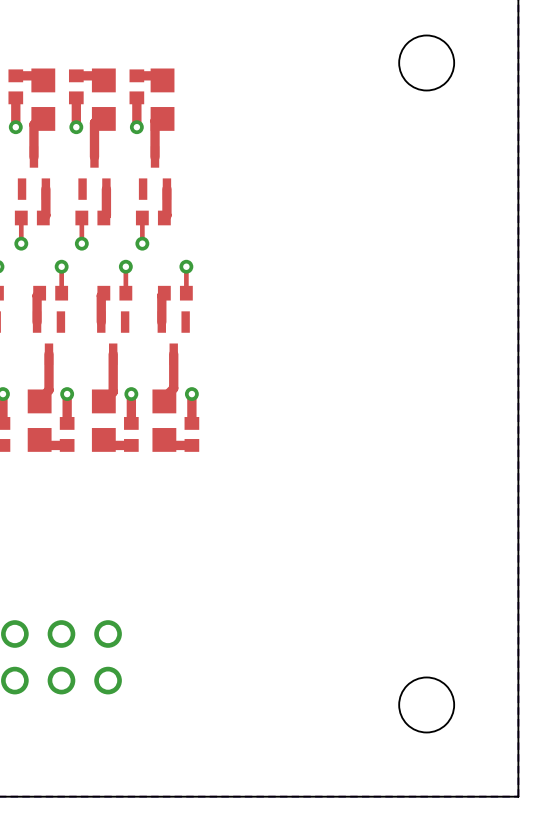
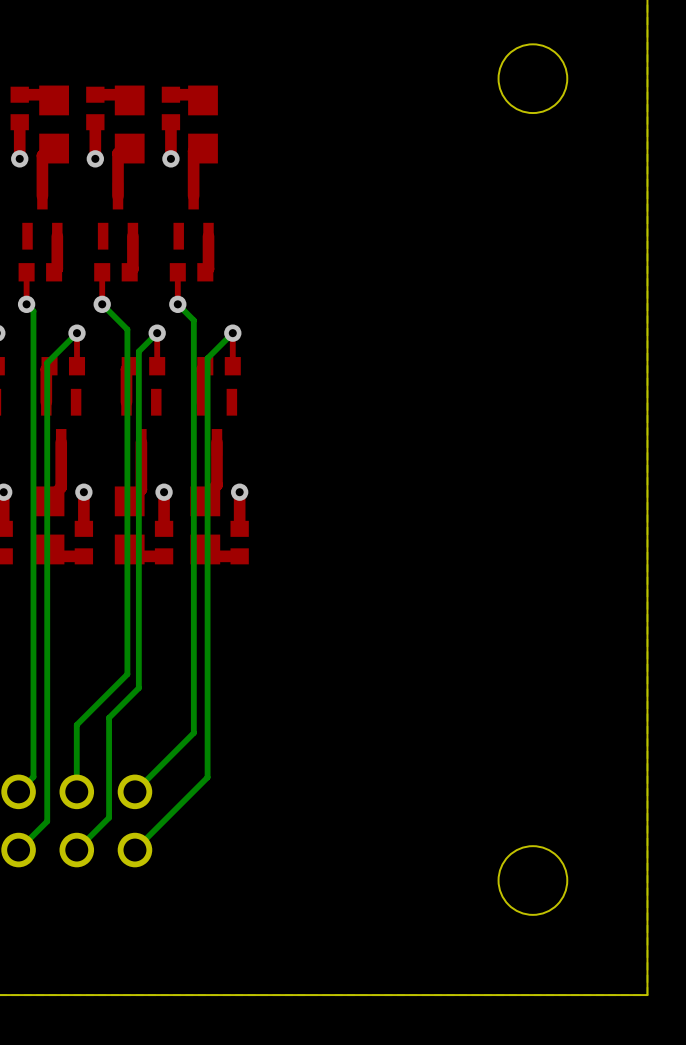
bottom track: none -> (26, 304) (33, 311) (33, 776) (18, 791)
bottom track: none -> (102, 304) (127, 329) (127, 674) (76, 724) (76, 791)
bottom track: none -> (177, 304) (193, 320) (193, 732) (134, 791)
bottom track: none -> (77, 333) (47, 362) (47, 821) (18, 850)
bottom track: none -> (157, 333) (138, 351) (138, 688) (109, 717) (109, 817) (76, 850)
bottom track: none -> (232, 333) (207, 358) (207, 777) (134, 850)

